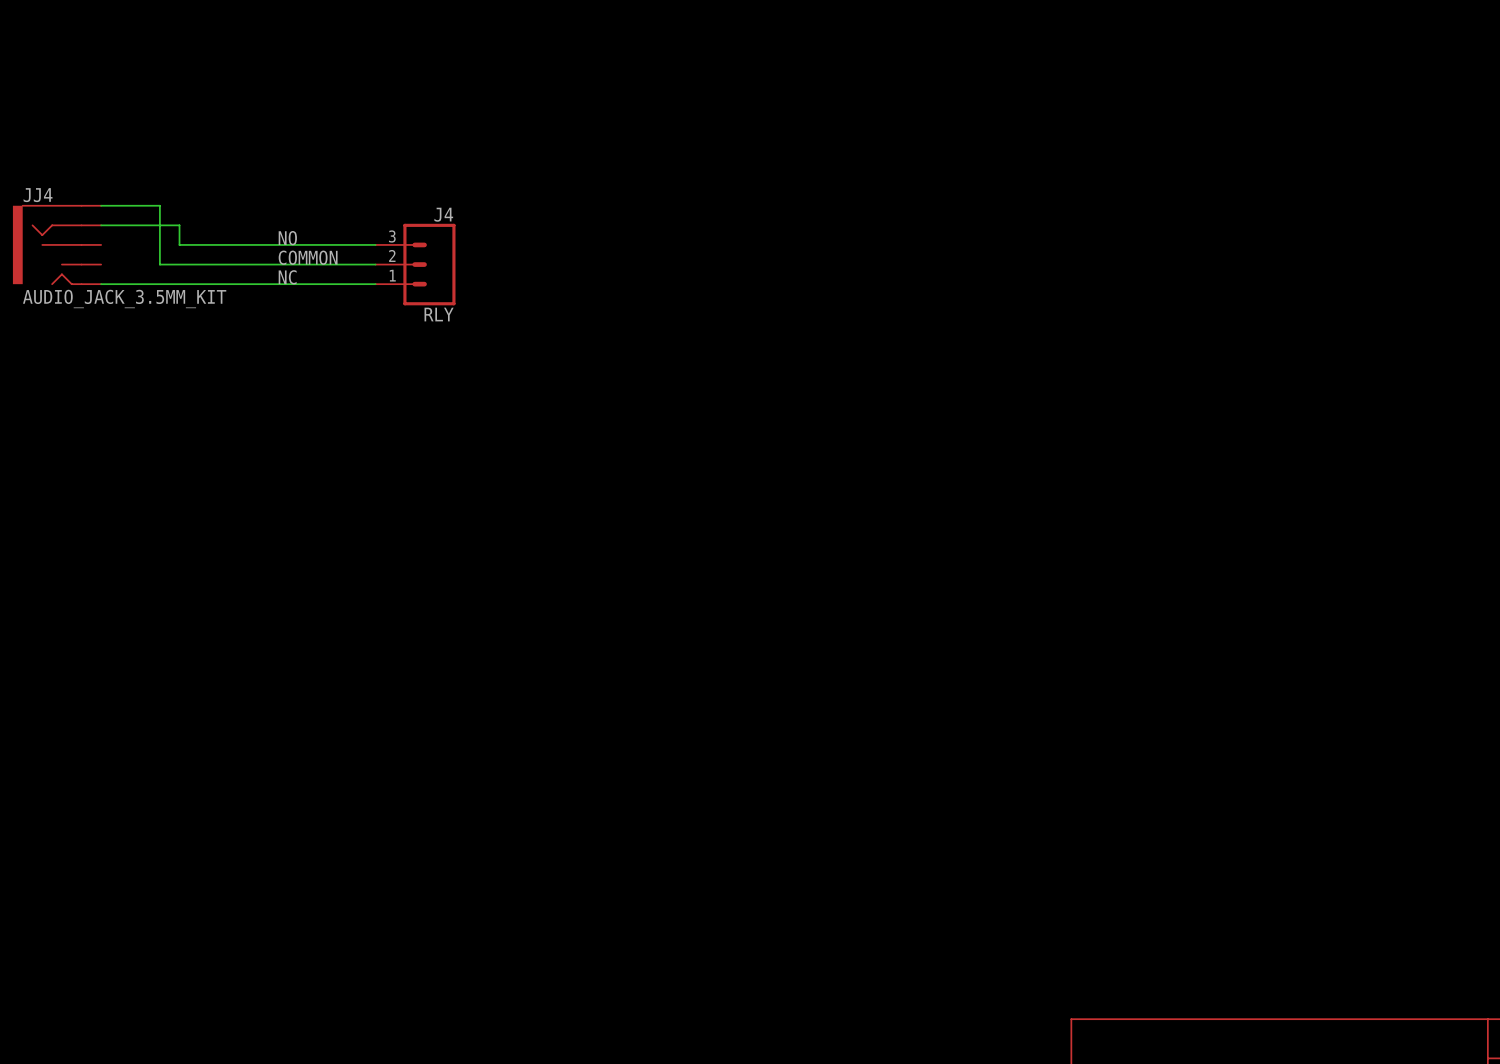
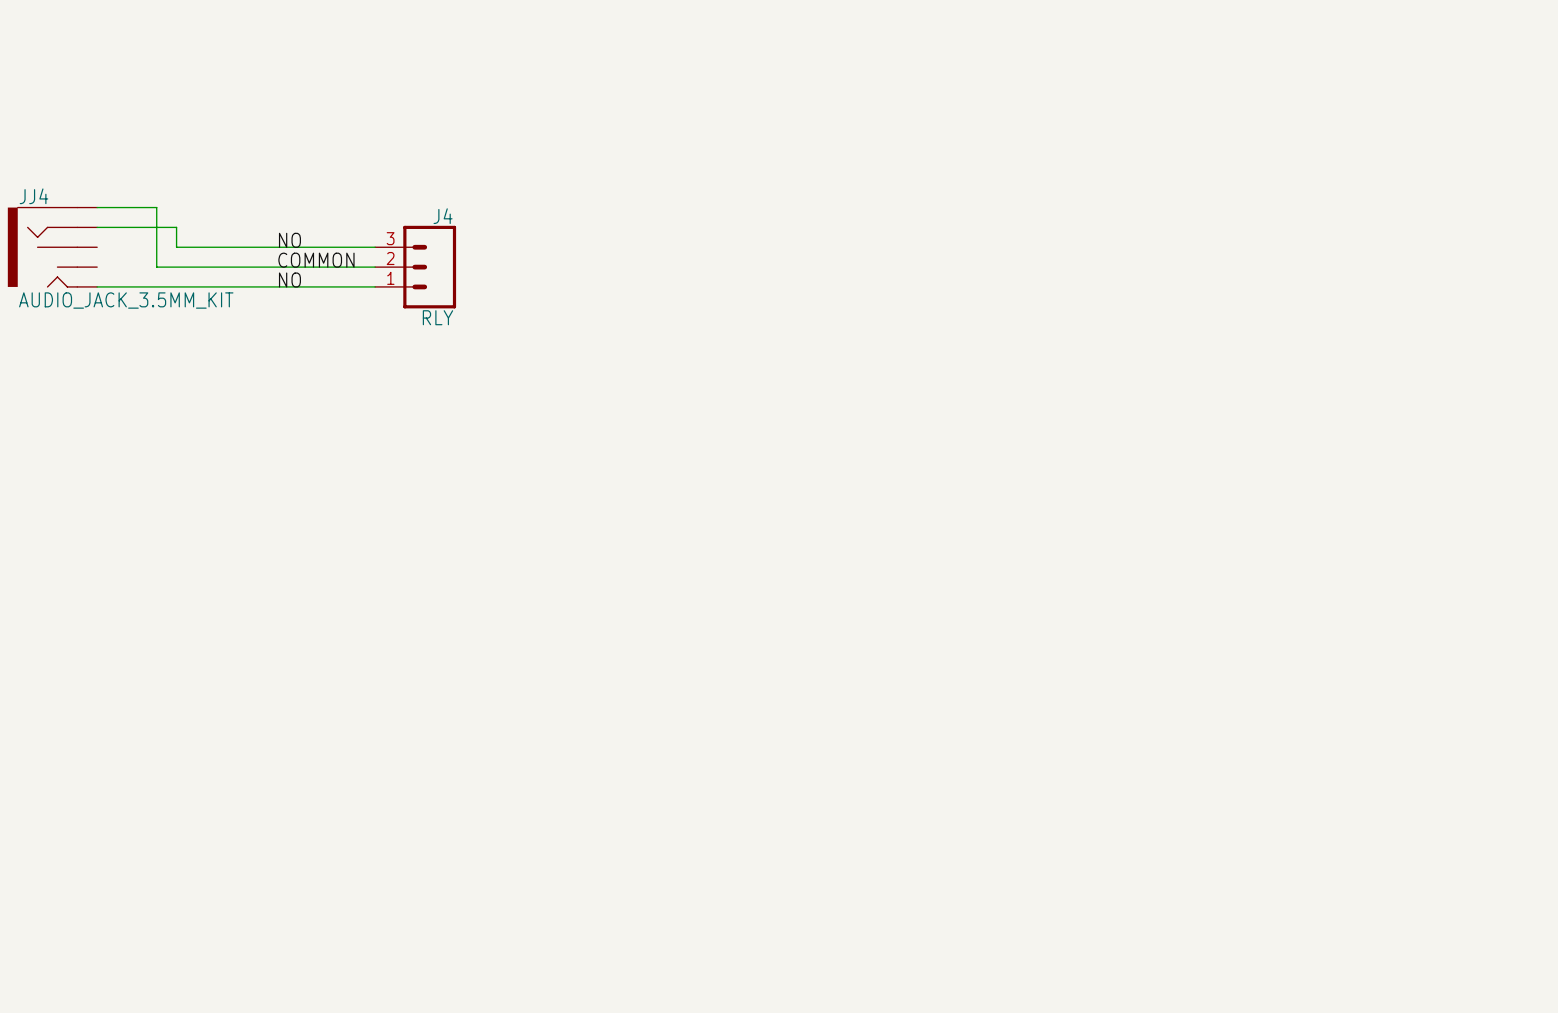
label: NC (287, 277) -> NO (289, 280)

